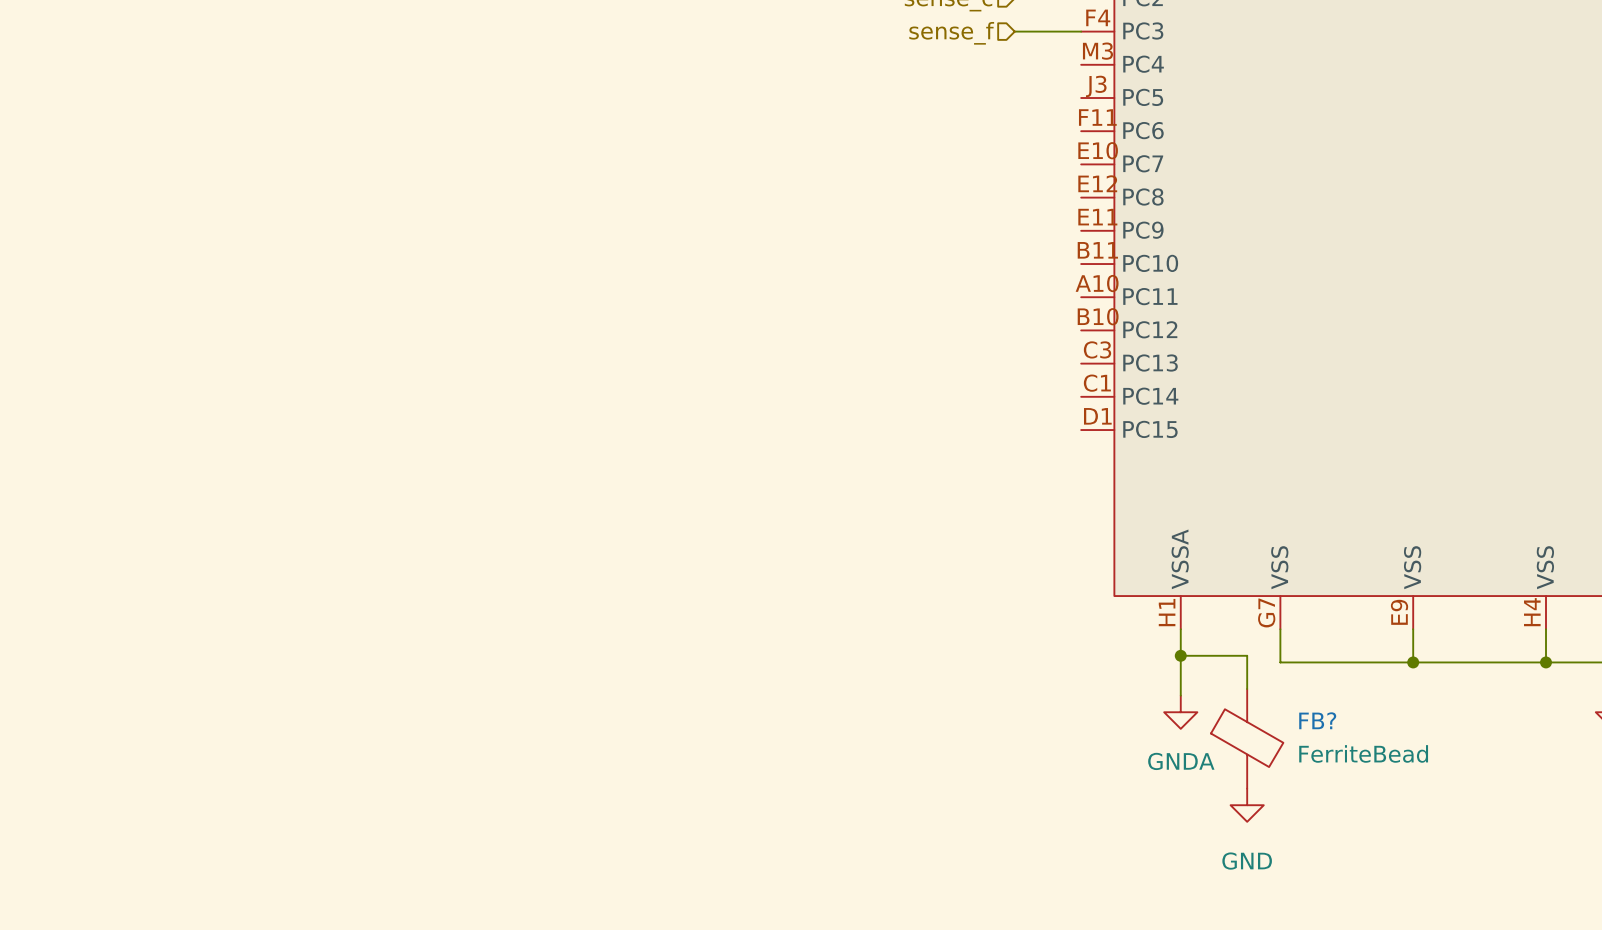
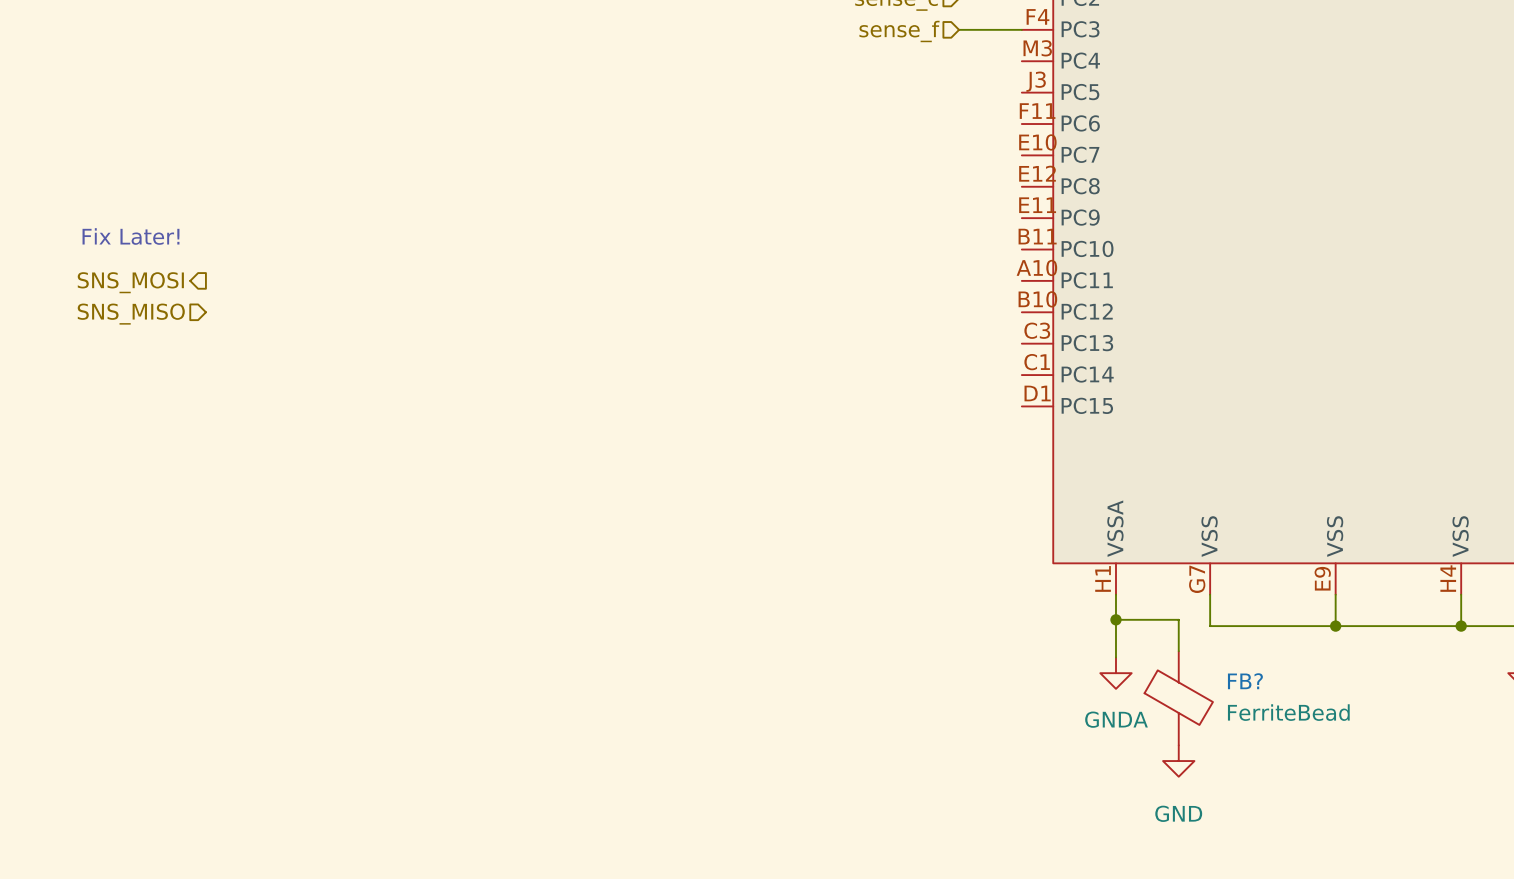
text: none -> Fix Later! (130, 236)
hierarchical label: none -> SNS_MOSI (130, 282)
hierarchical label: none -> SNS_MISO (131, 314)

